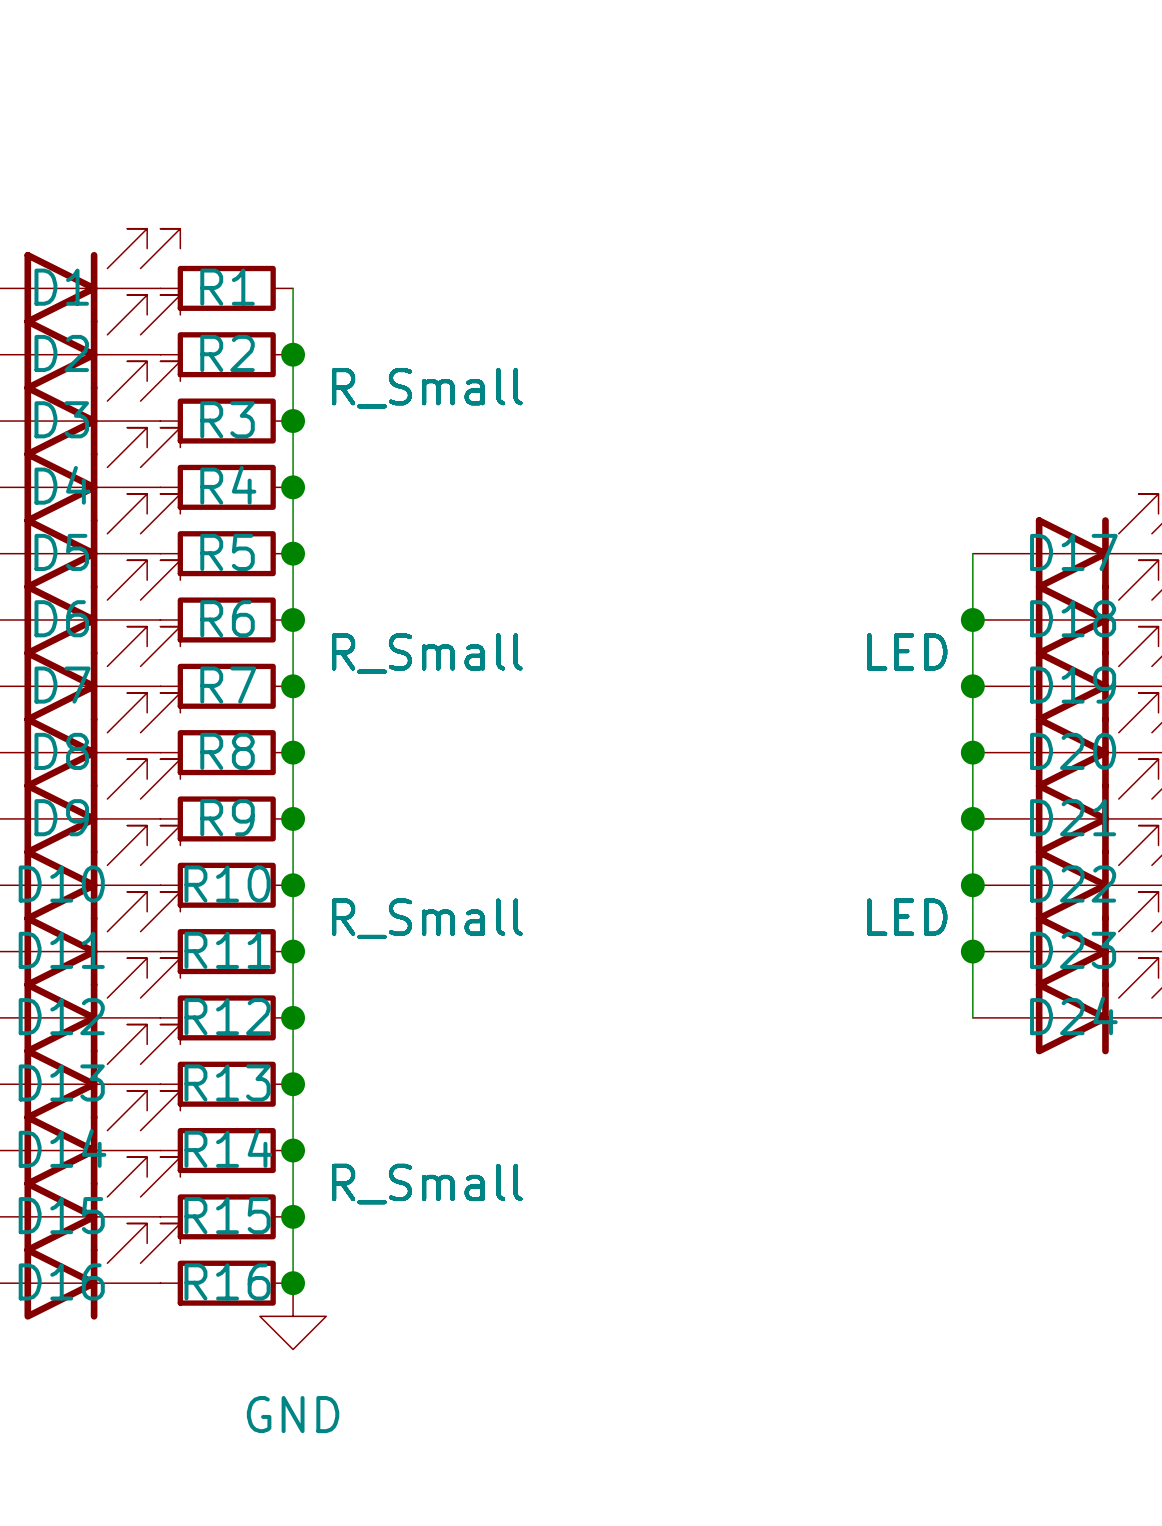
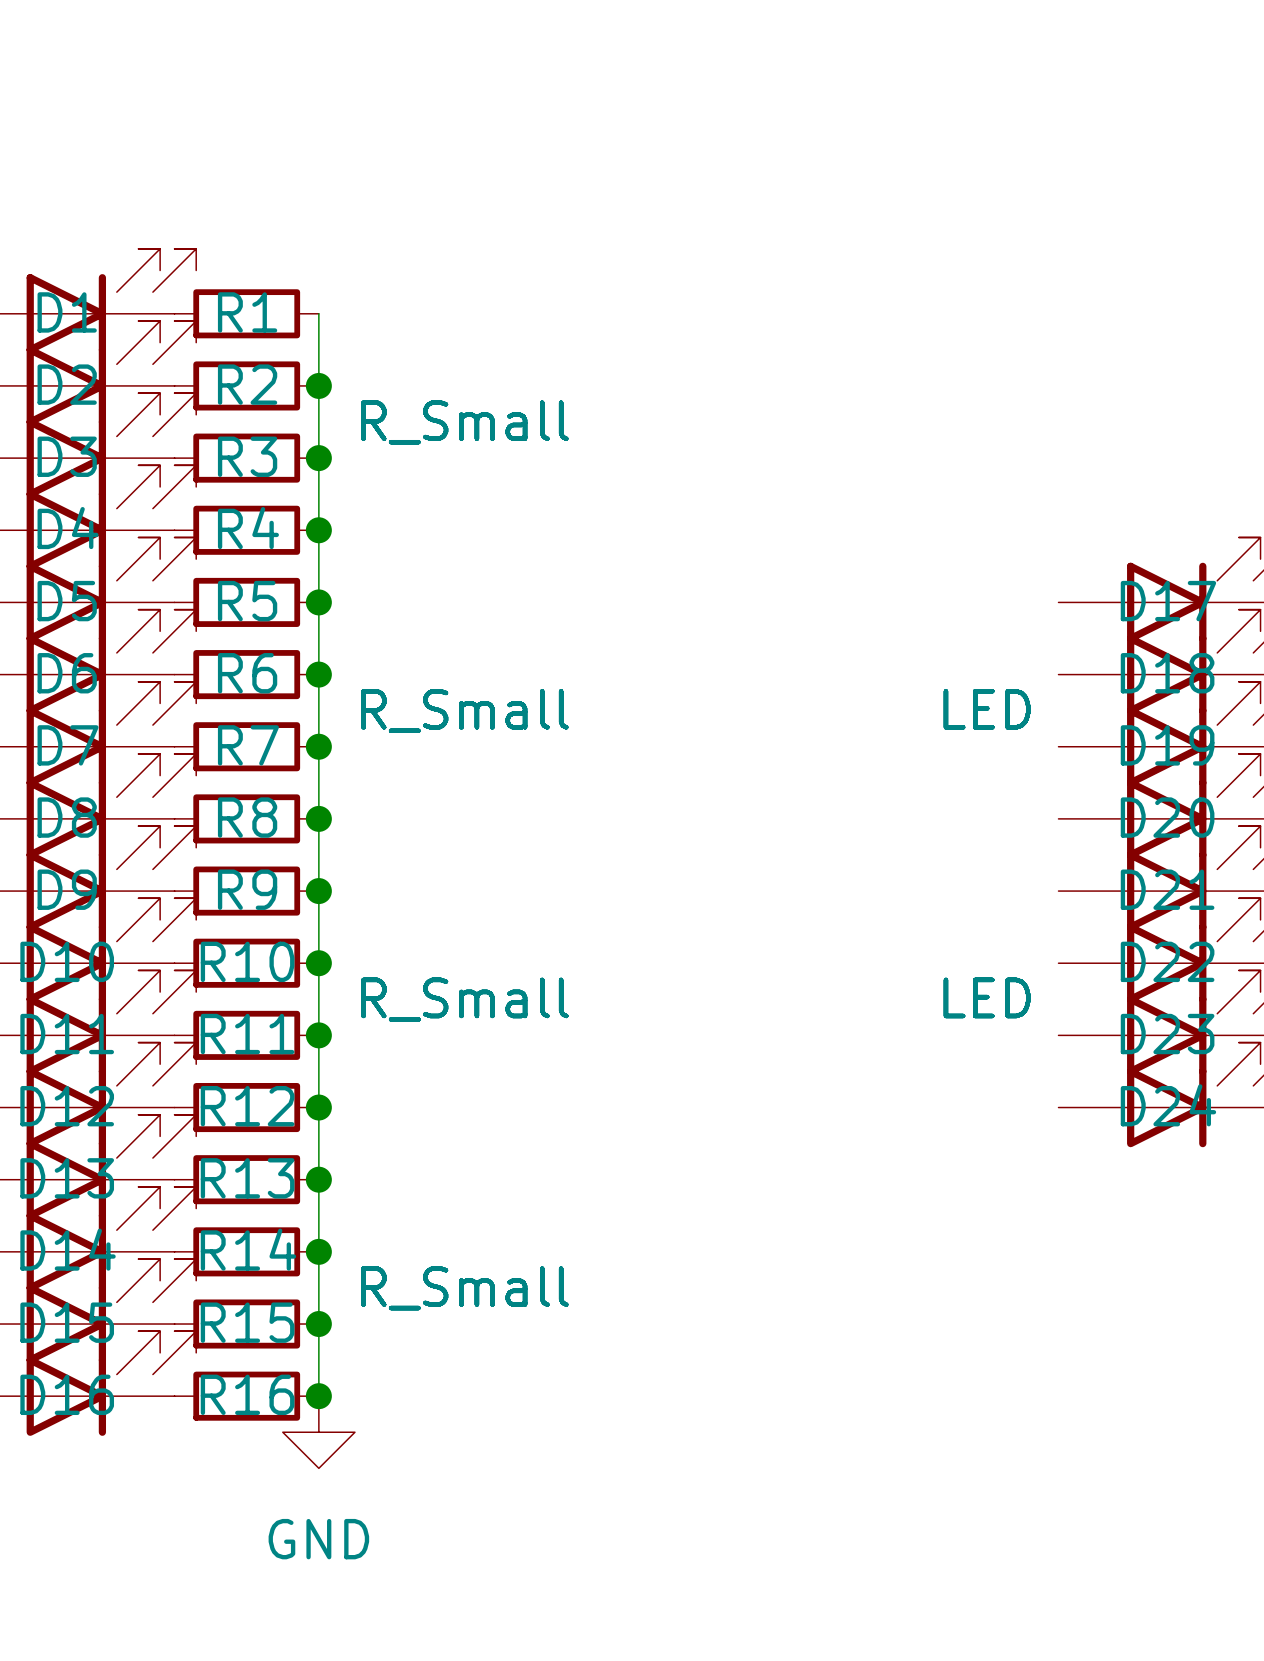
wire: (972, 553) (972, 1017) -> none
junction: (972, 619) -> none
junction: (972, 686) -> none
junction: (972, 752) -> none
junction: (972, 818) -> none
junction: (972, 885) -> none
junction: (972, 951) -> none

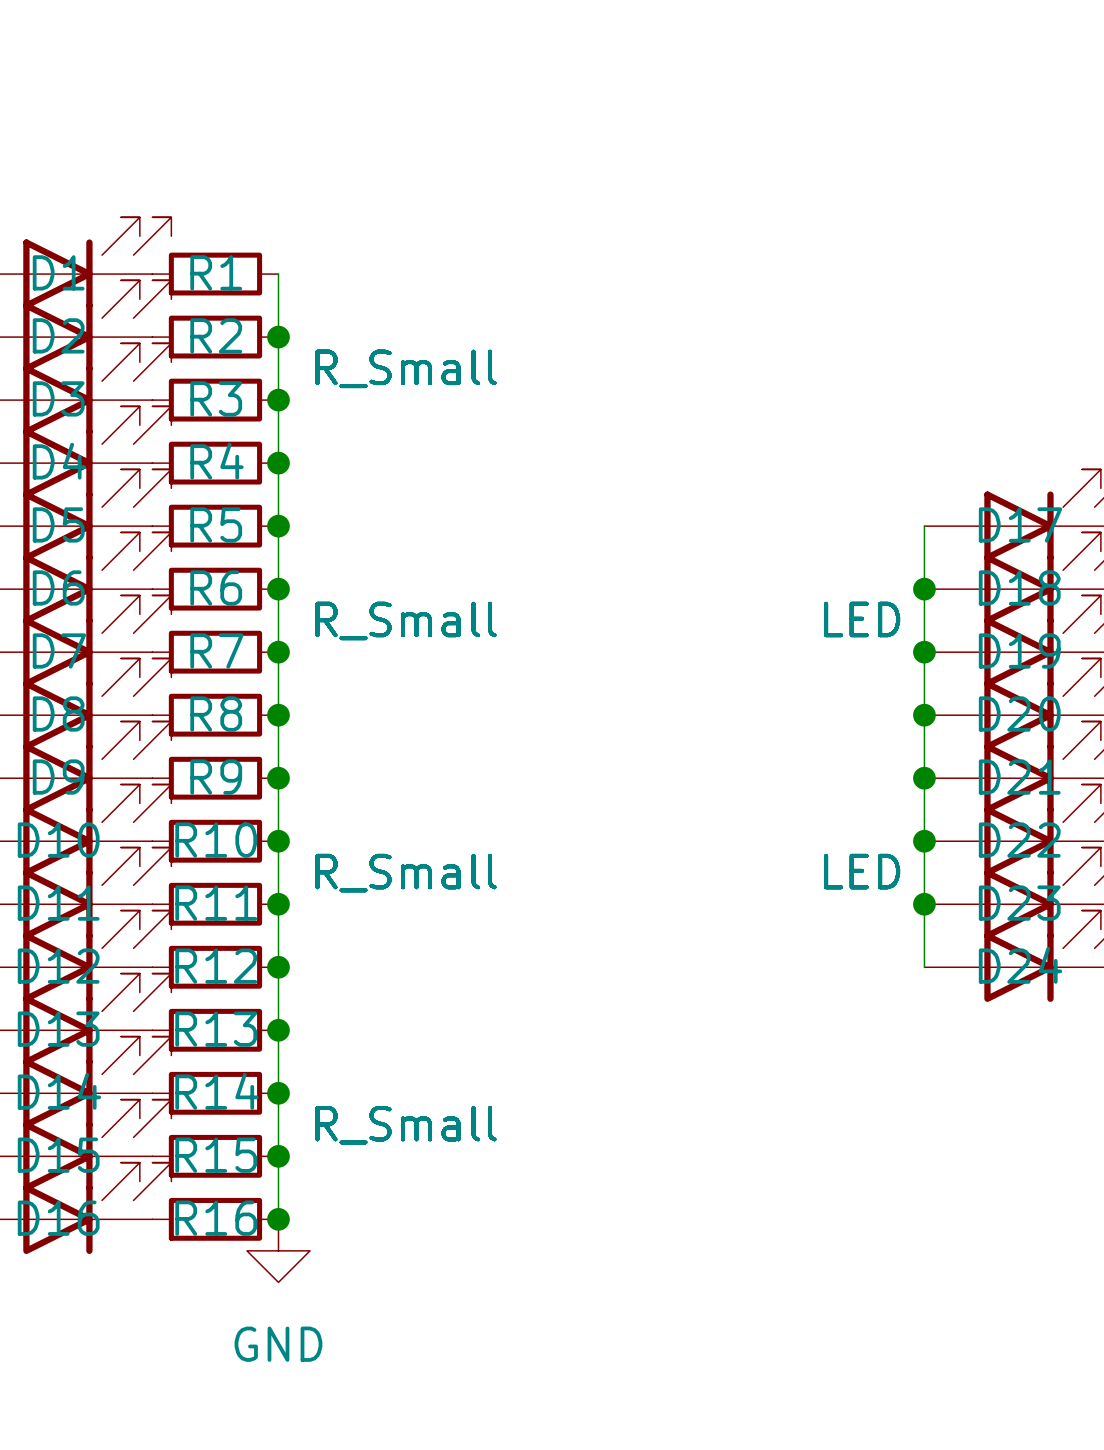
wire: none -> (924, 526) (924, 967)
junction: none -> (924, 589)
junction: none -> (924, 652)
junction: none -> (924, 715)
junction: none -> (924, 778)
junction: none -> (924, 841)
junction: none -> (924, 904)

